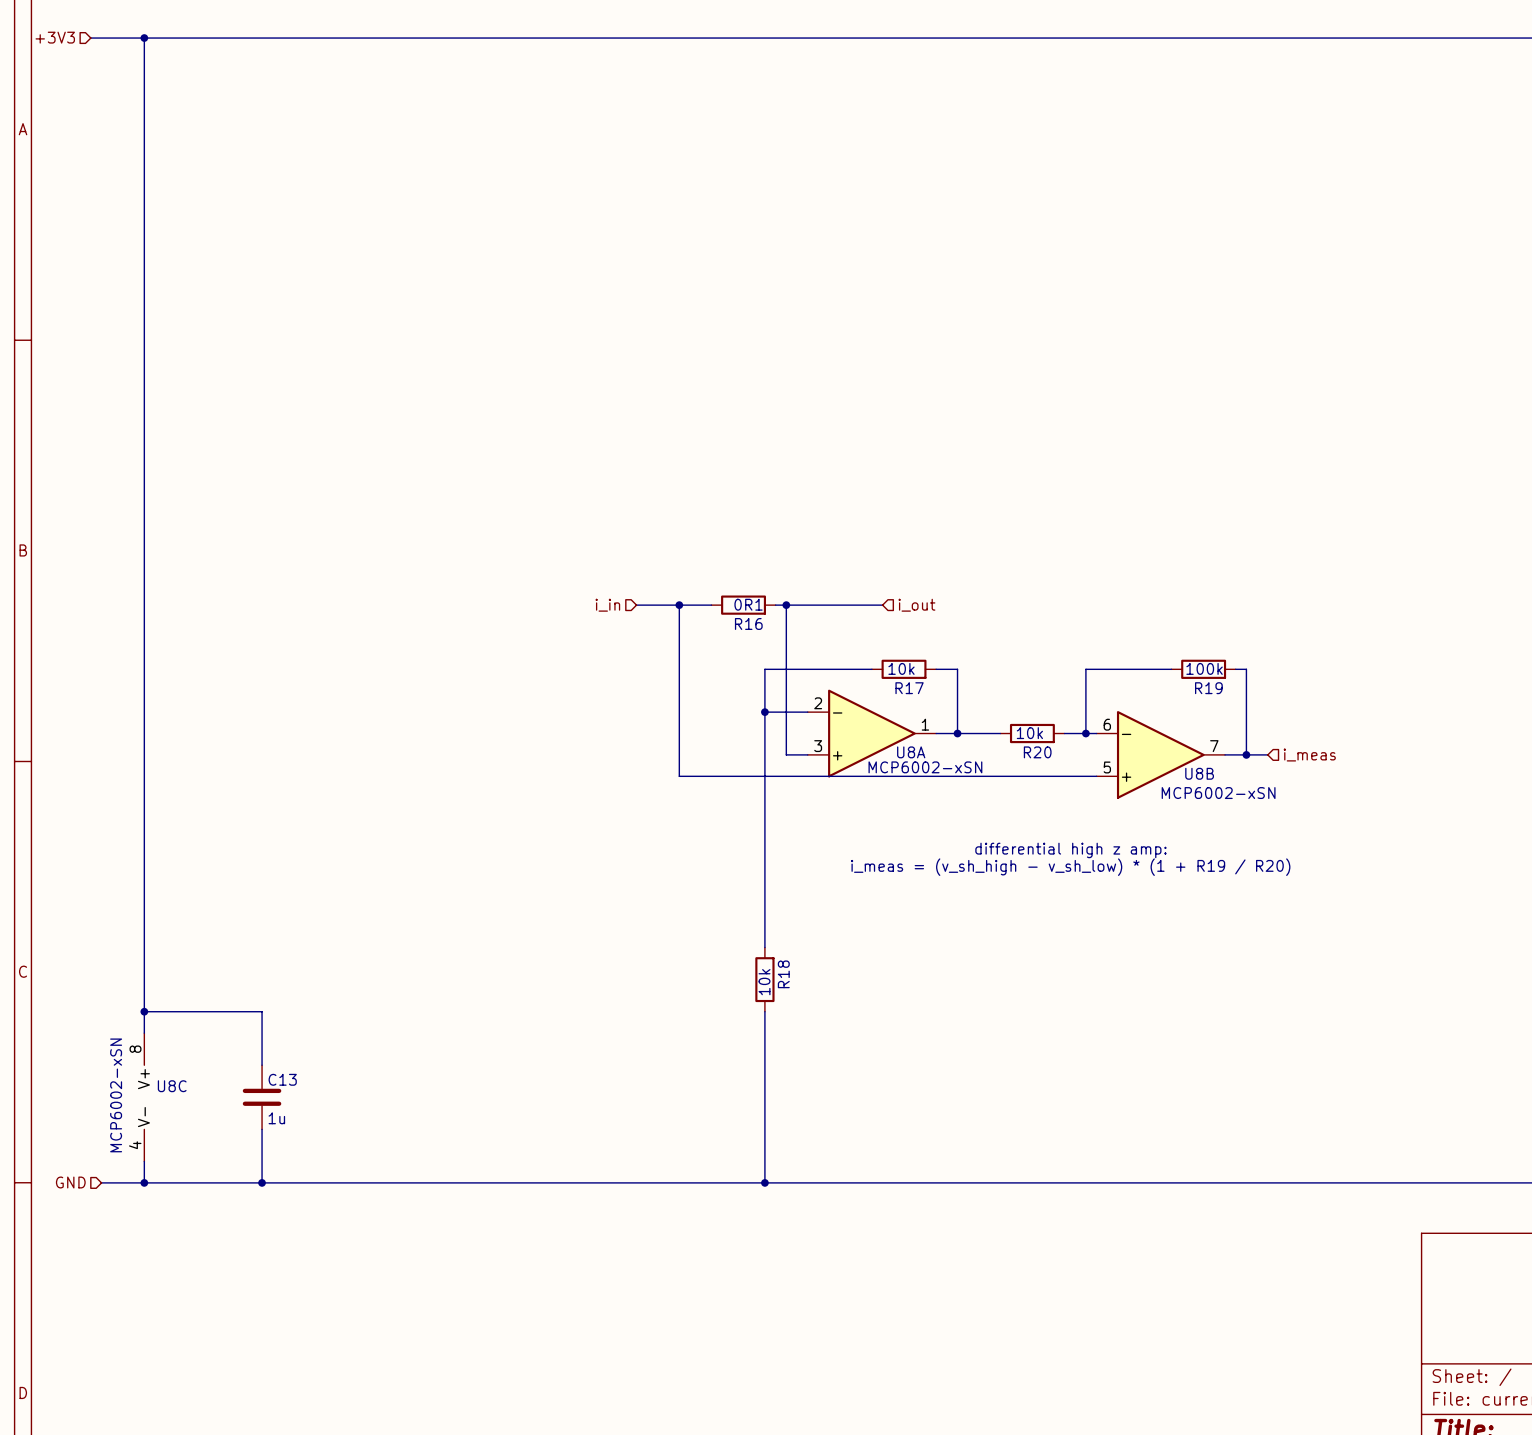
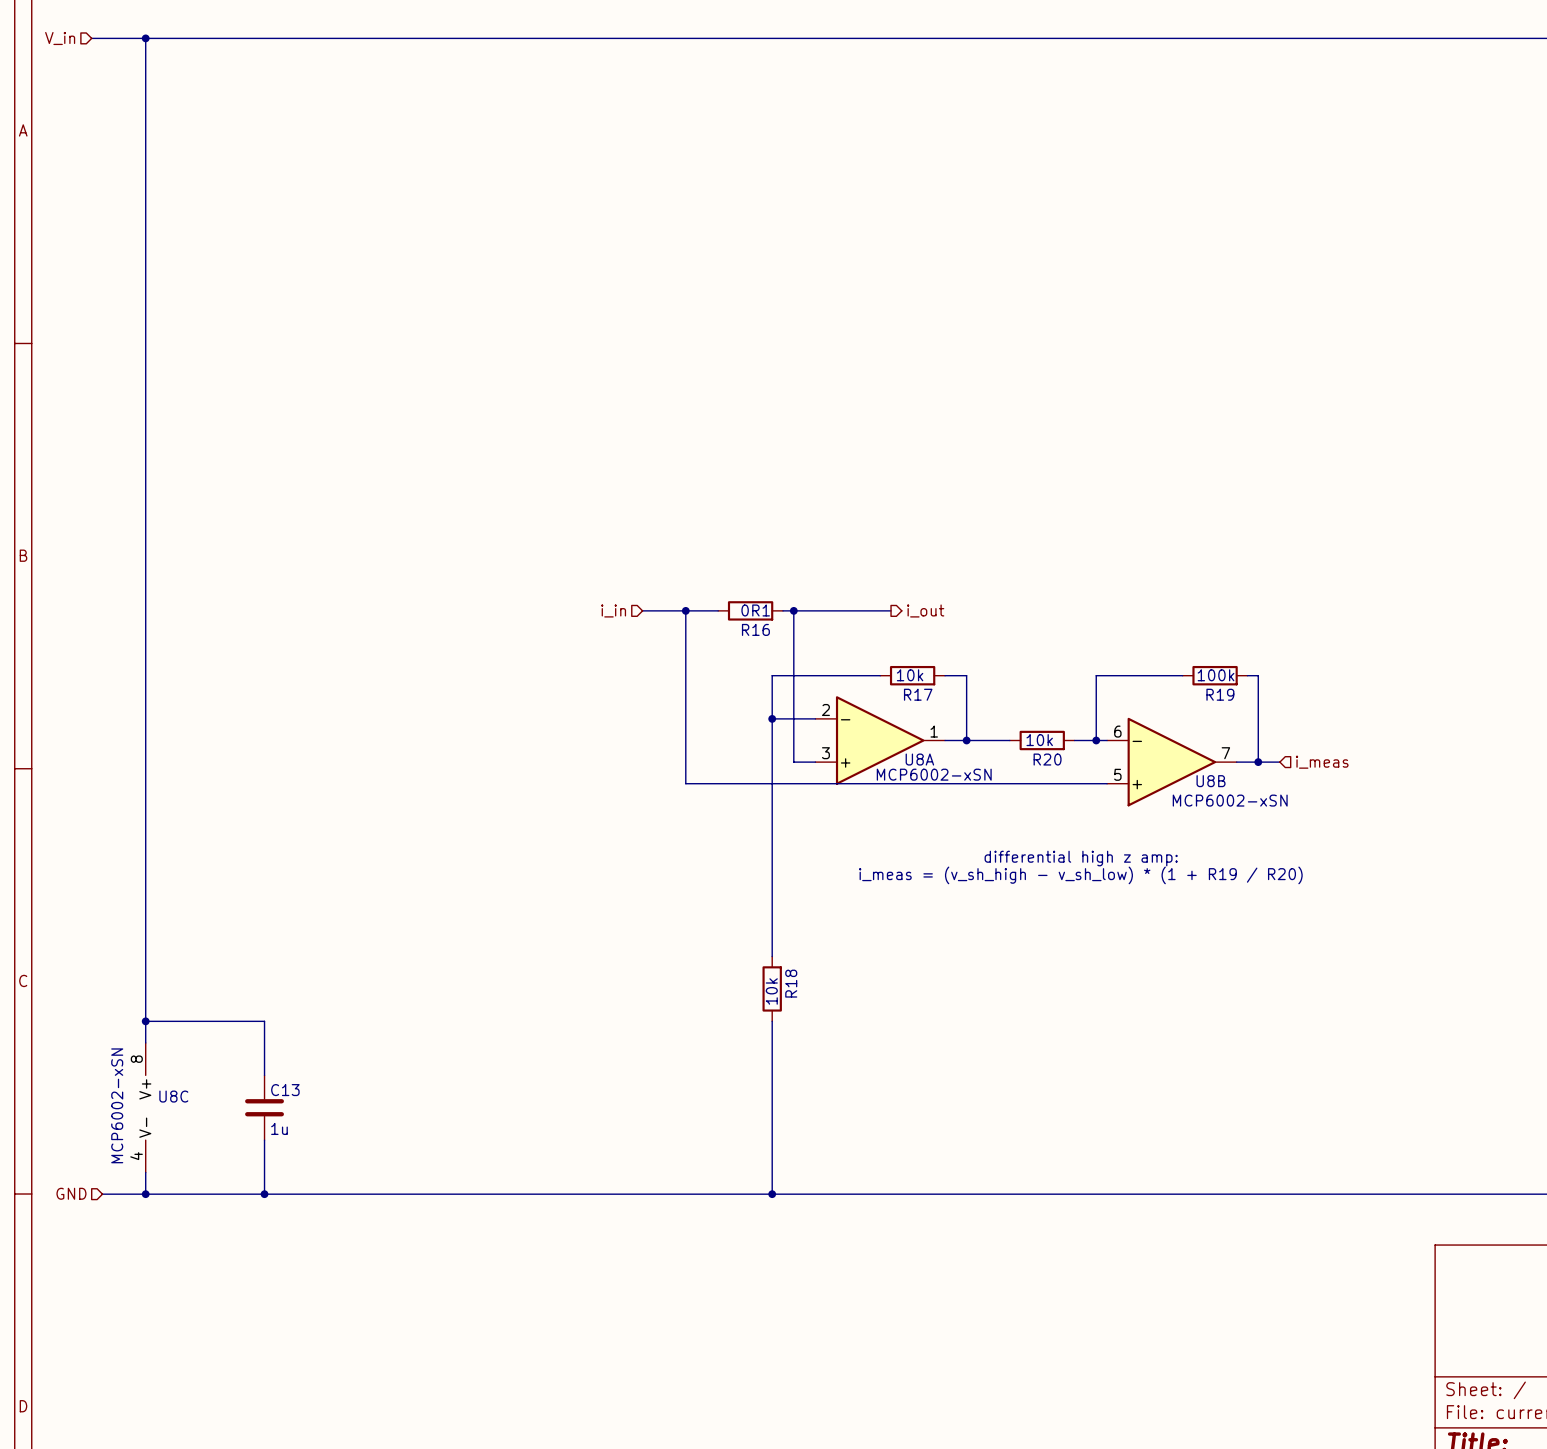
hierarchical label: +3V3 (55, 37) -> V_in (60, 38)
hierarchical label shape: input (916, 605) -> output (925, 610)

